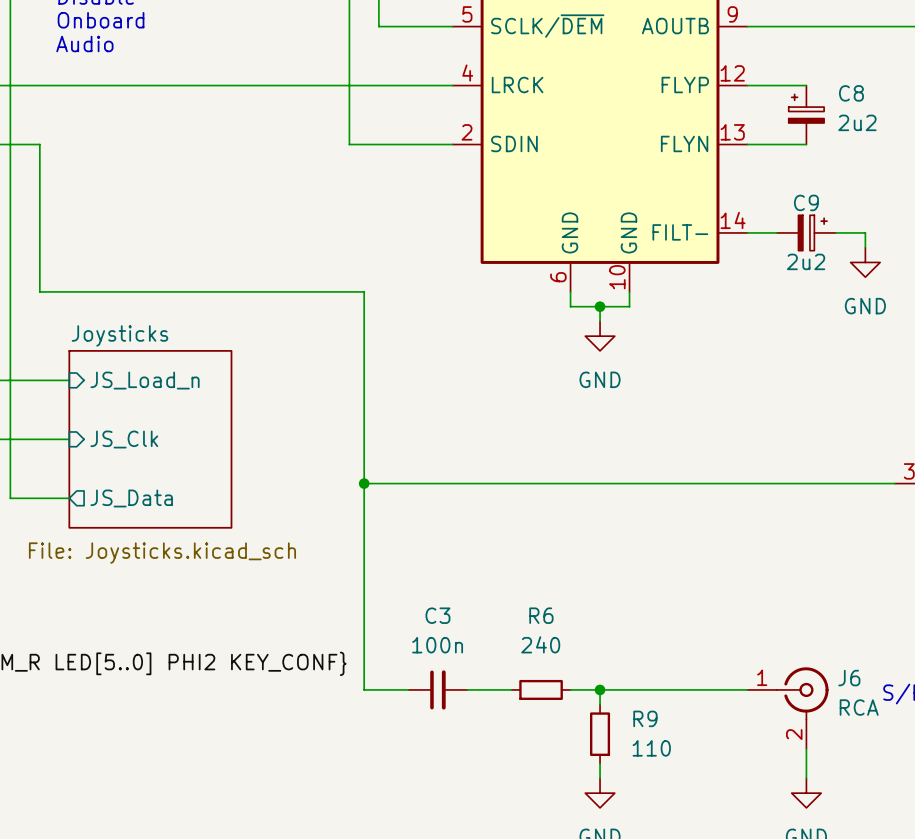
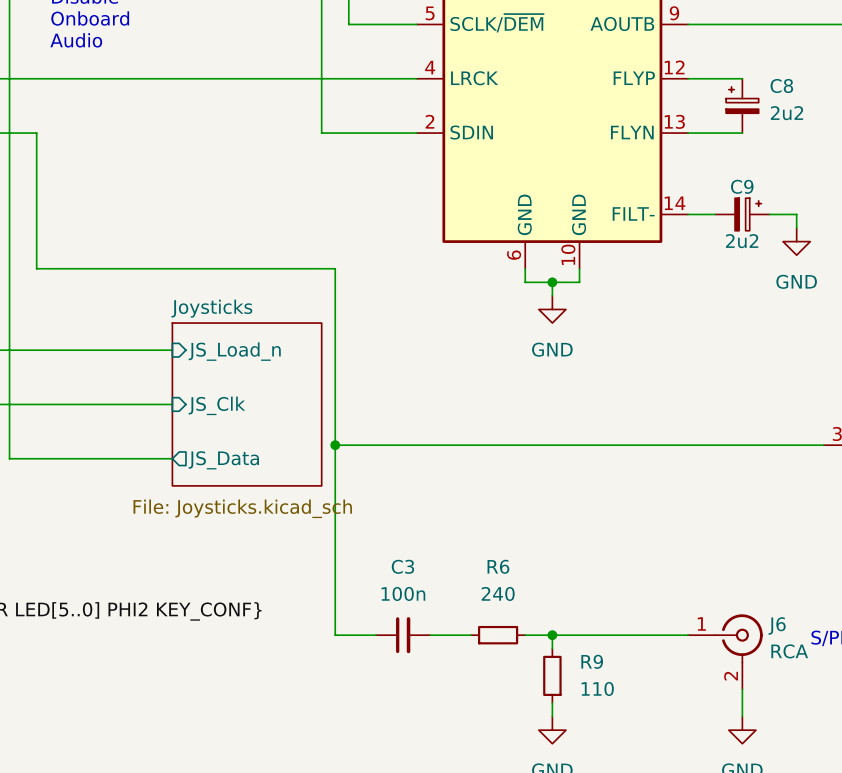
wire: none -> (63, 350) (172, 350)
sheet pin position: JS_Load_n (145, 380) -> JS_Load_n (234, 351)
wire: none -> (63, 404) (172, 404)
sheet pin position: JS_Clk (124, 439) -> JS_Clk (216, 405)
sheet Joysticks position: (150, 439) -> (247, 404)
wire: none -> (63, 458) (172, 458)
sheet pin position: JS_Data (131, 498) -> JS_Data (223, 460)

